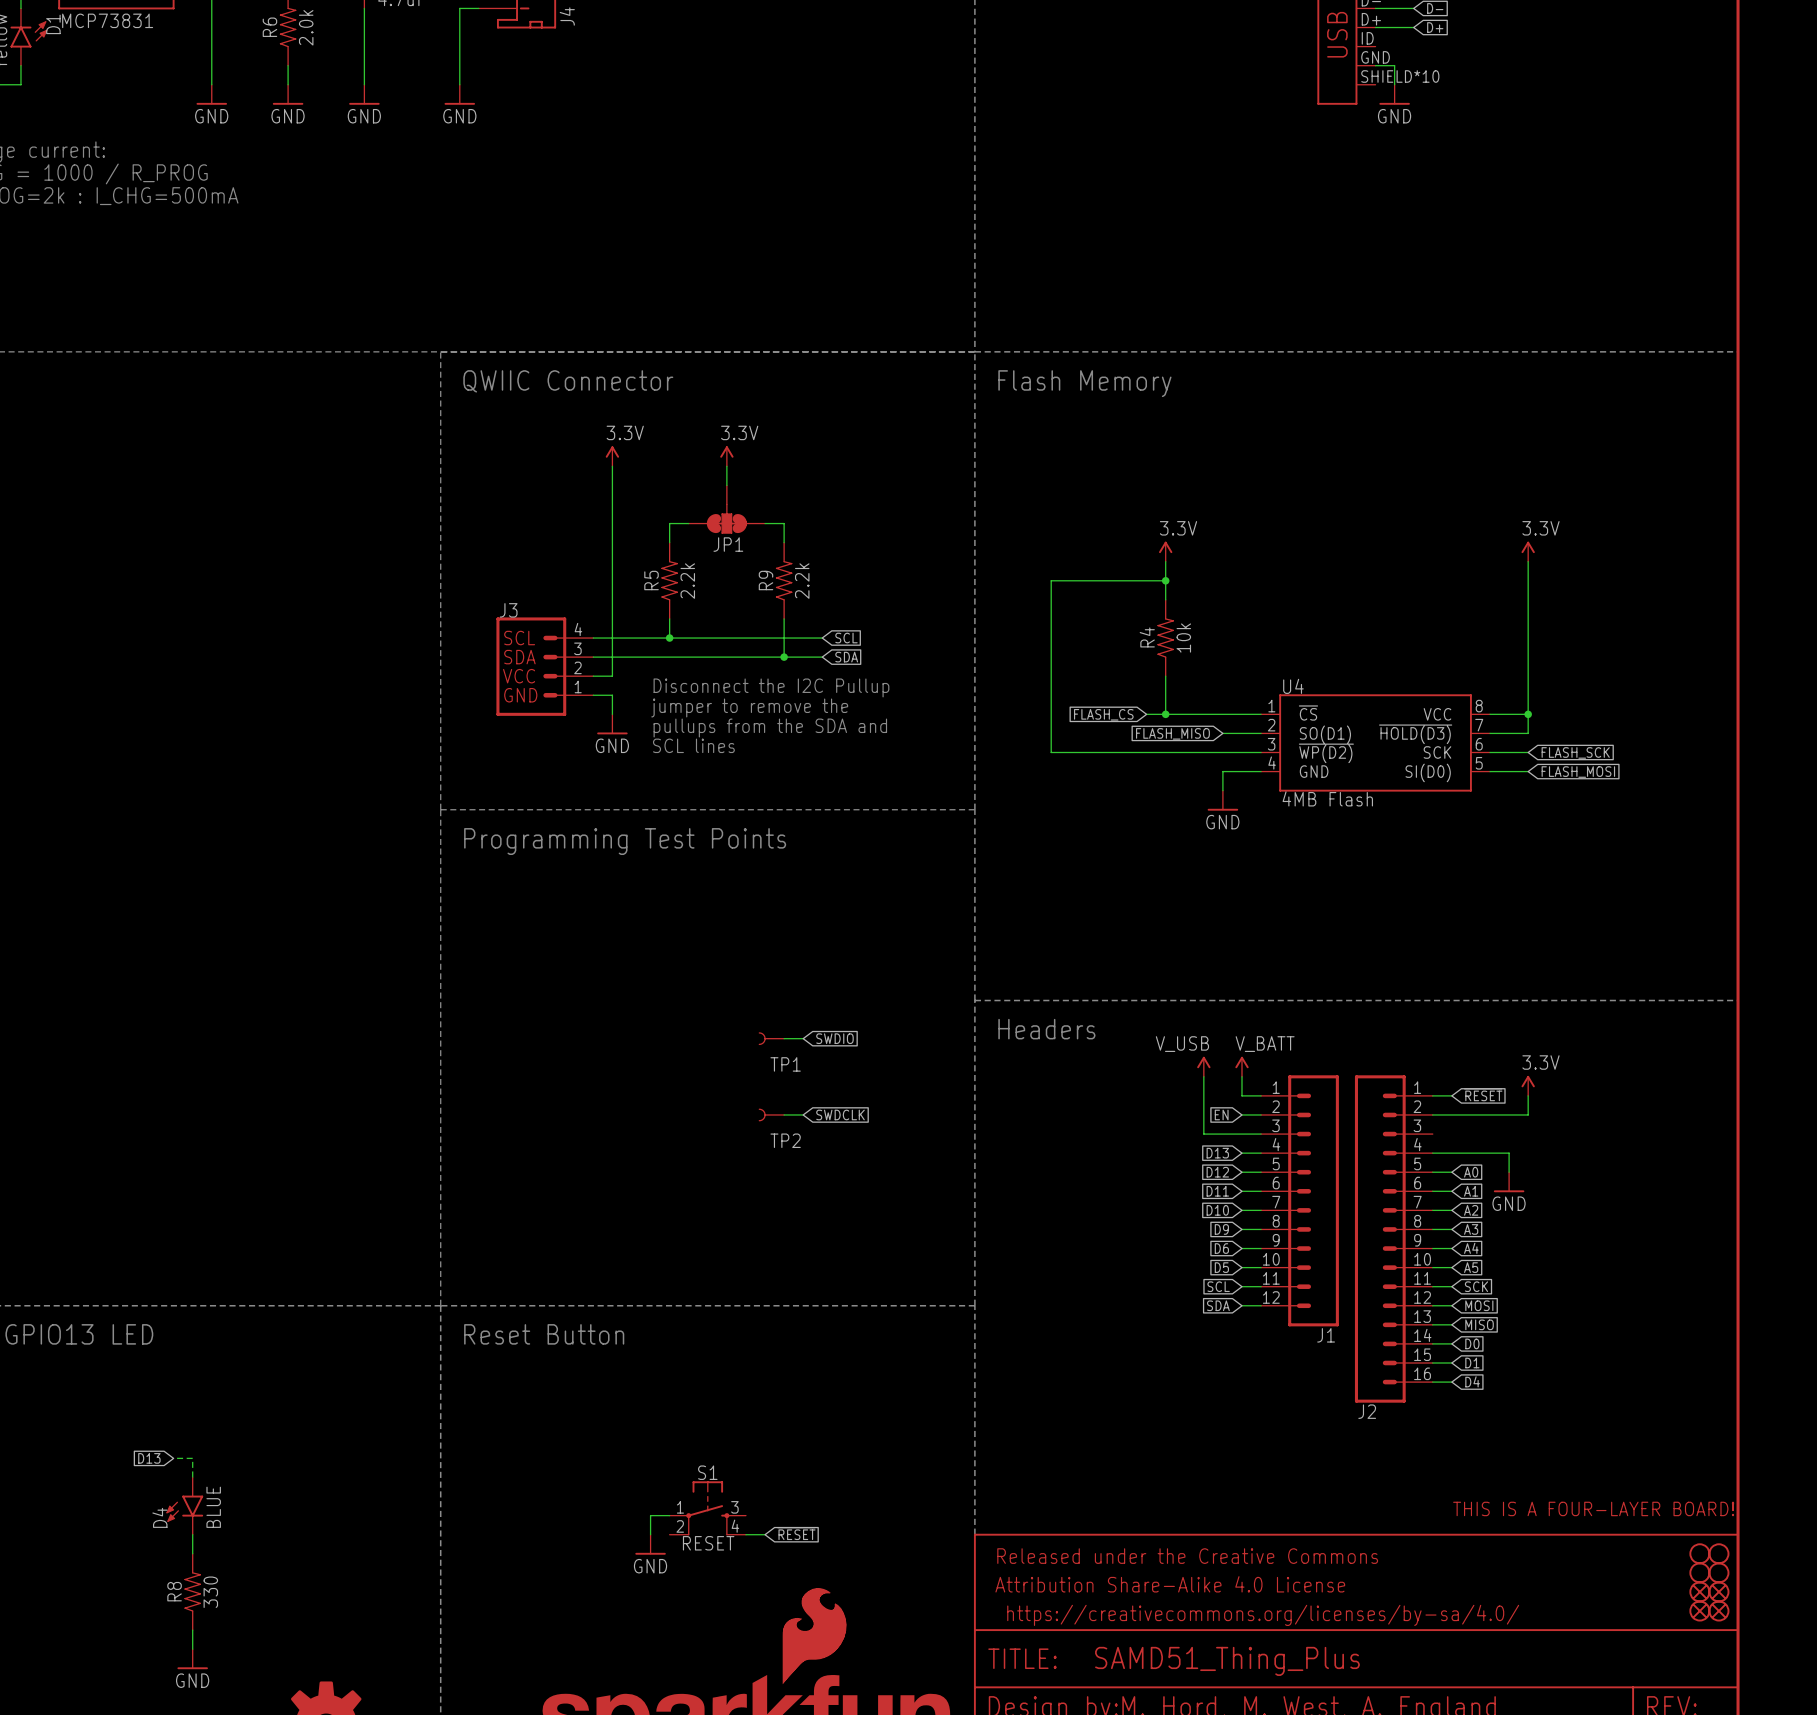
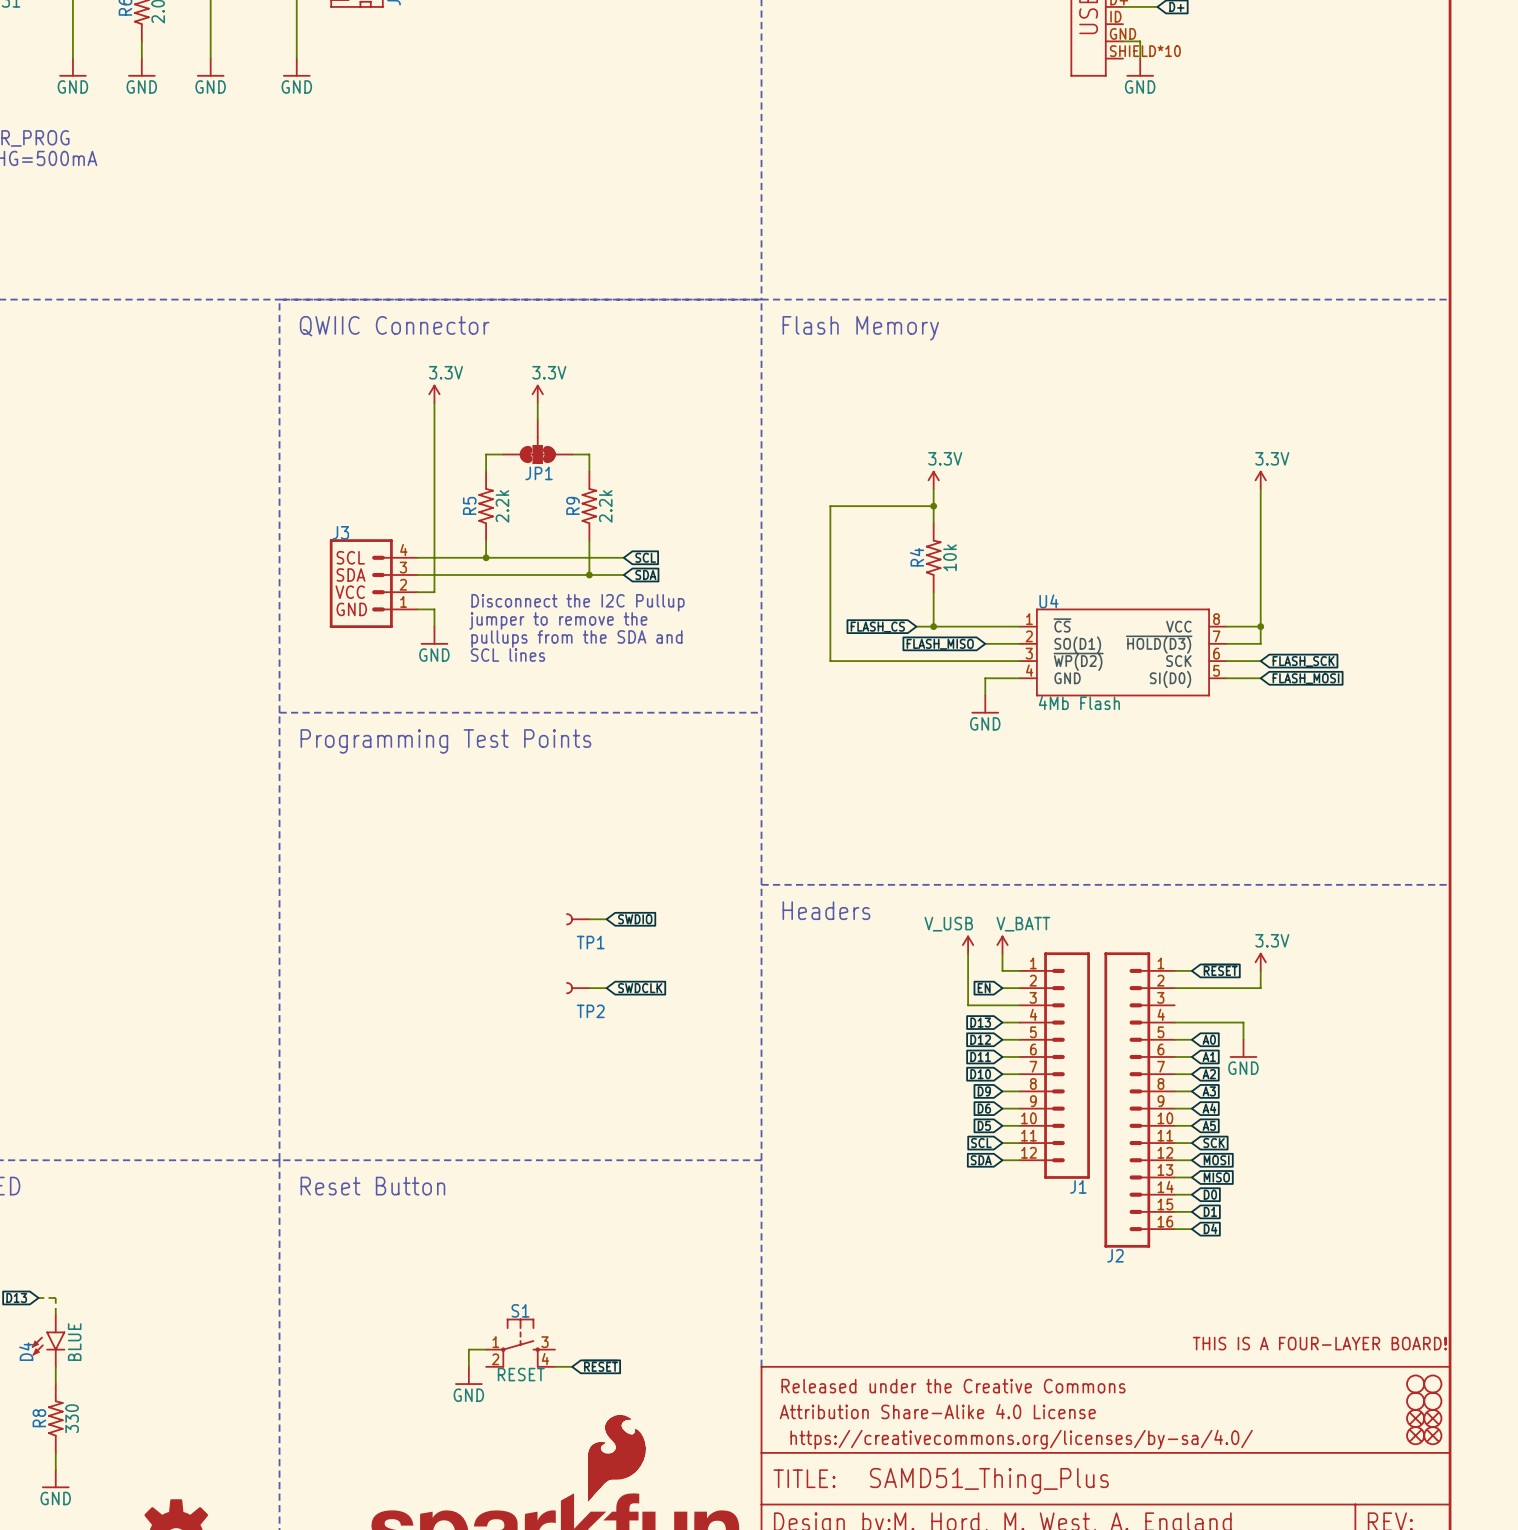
U4 value: 4MB Flash (1327, 798) -> 4Mb Flash (1079, 702)

